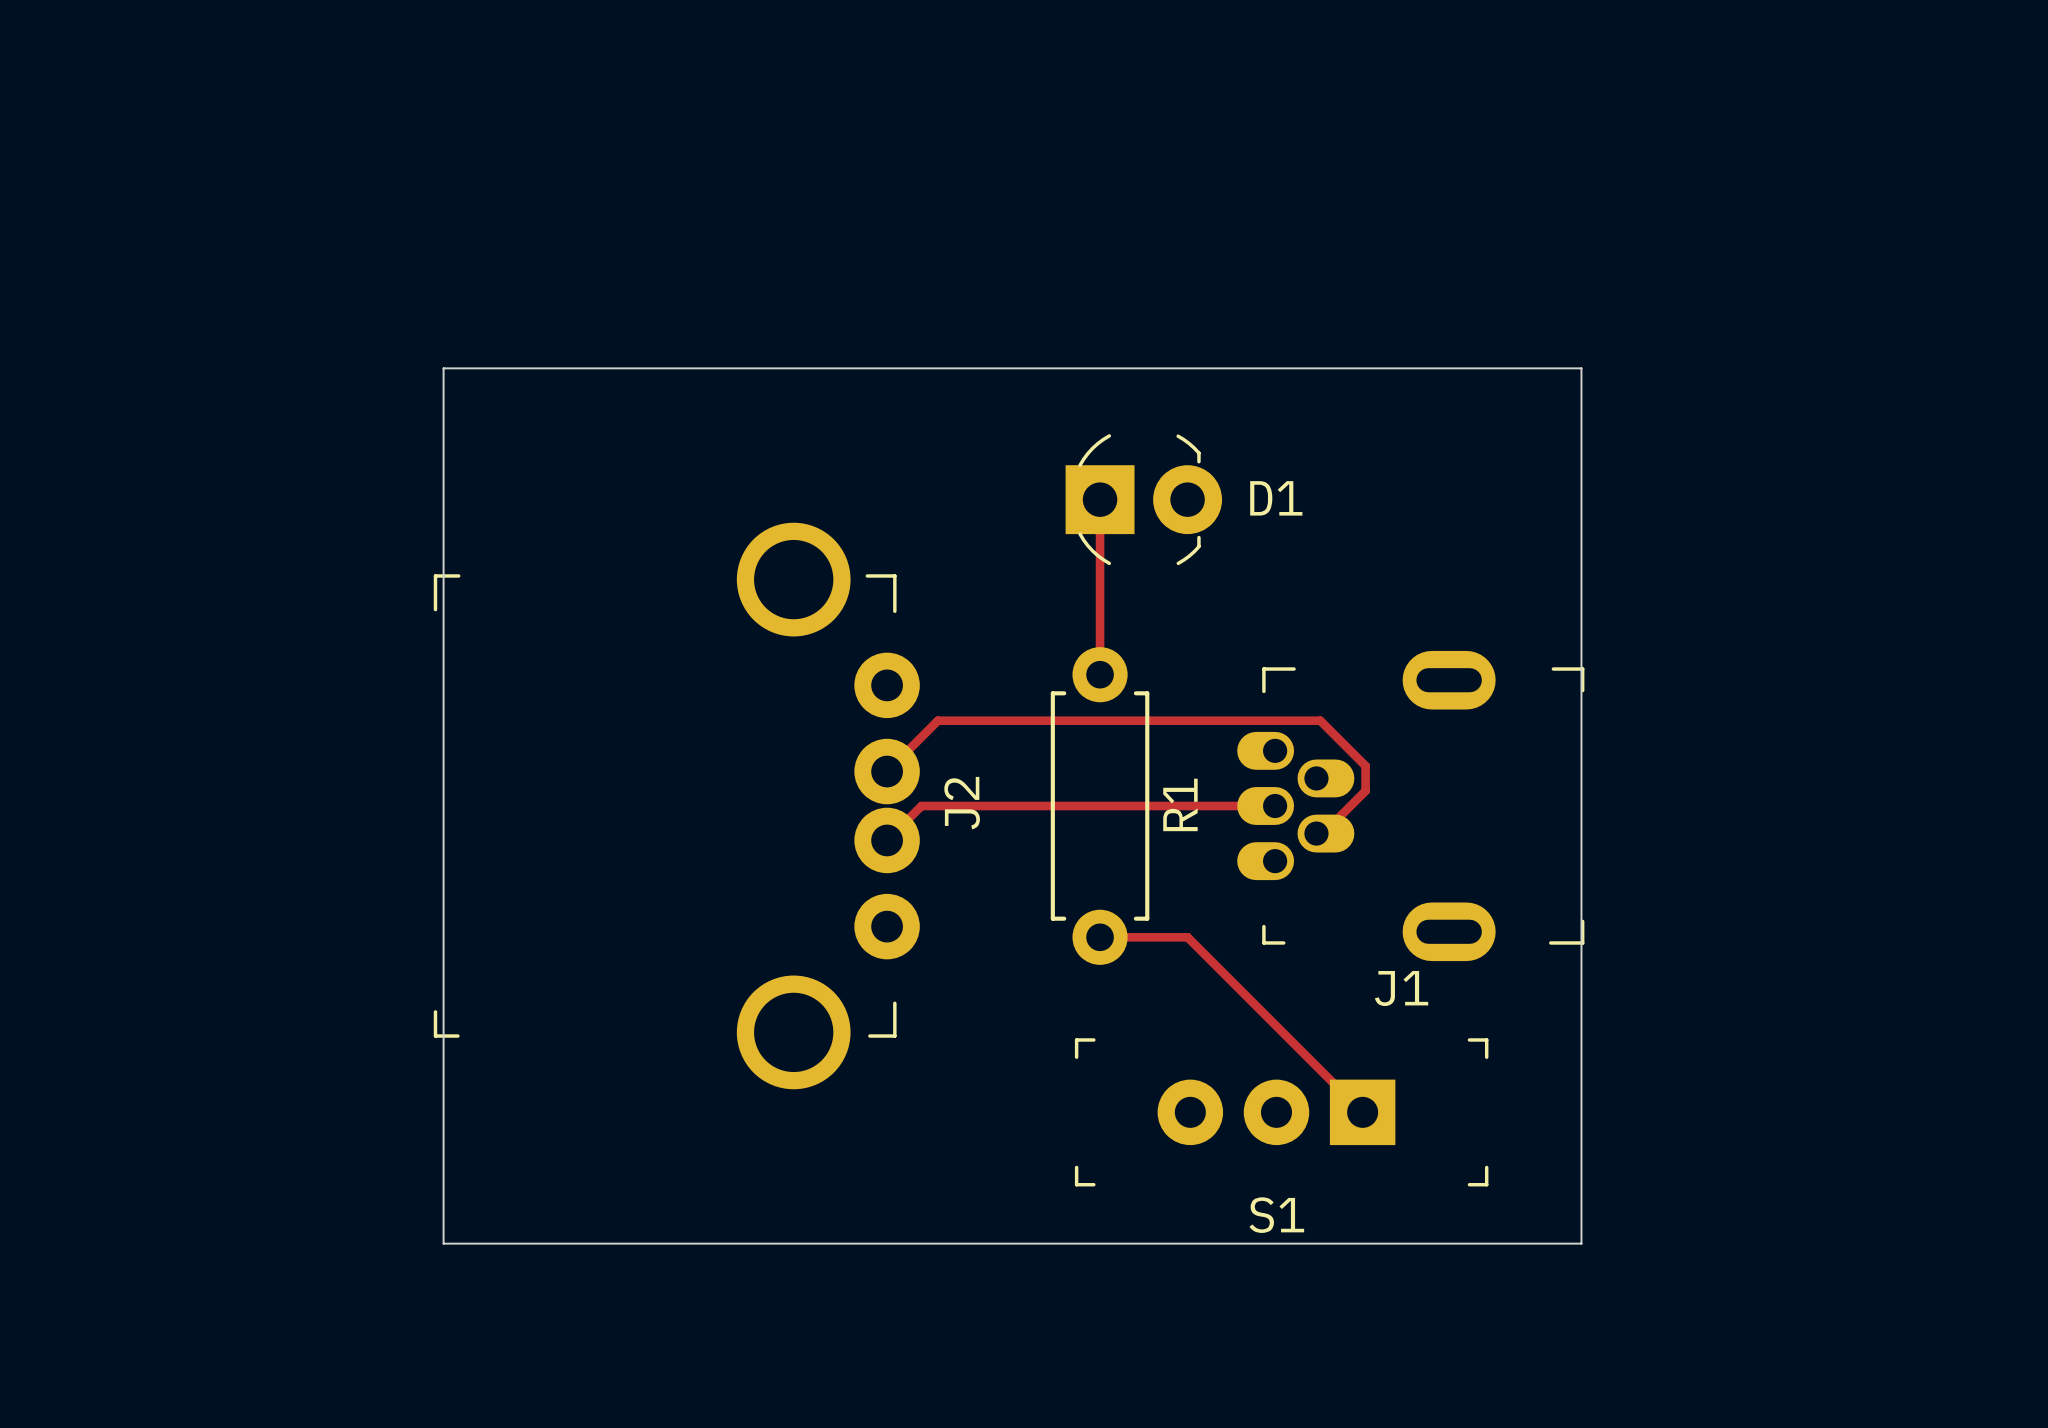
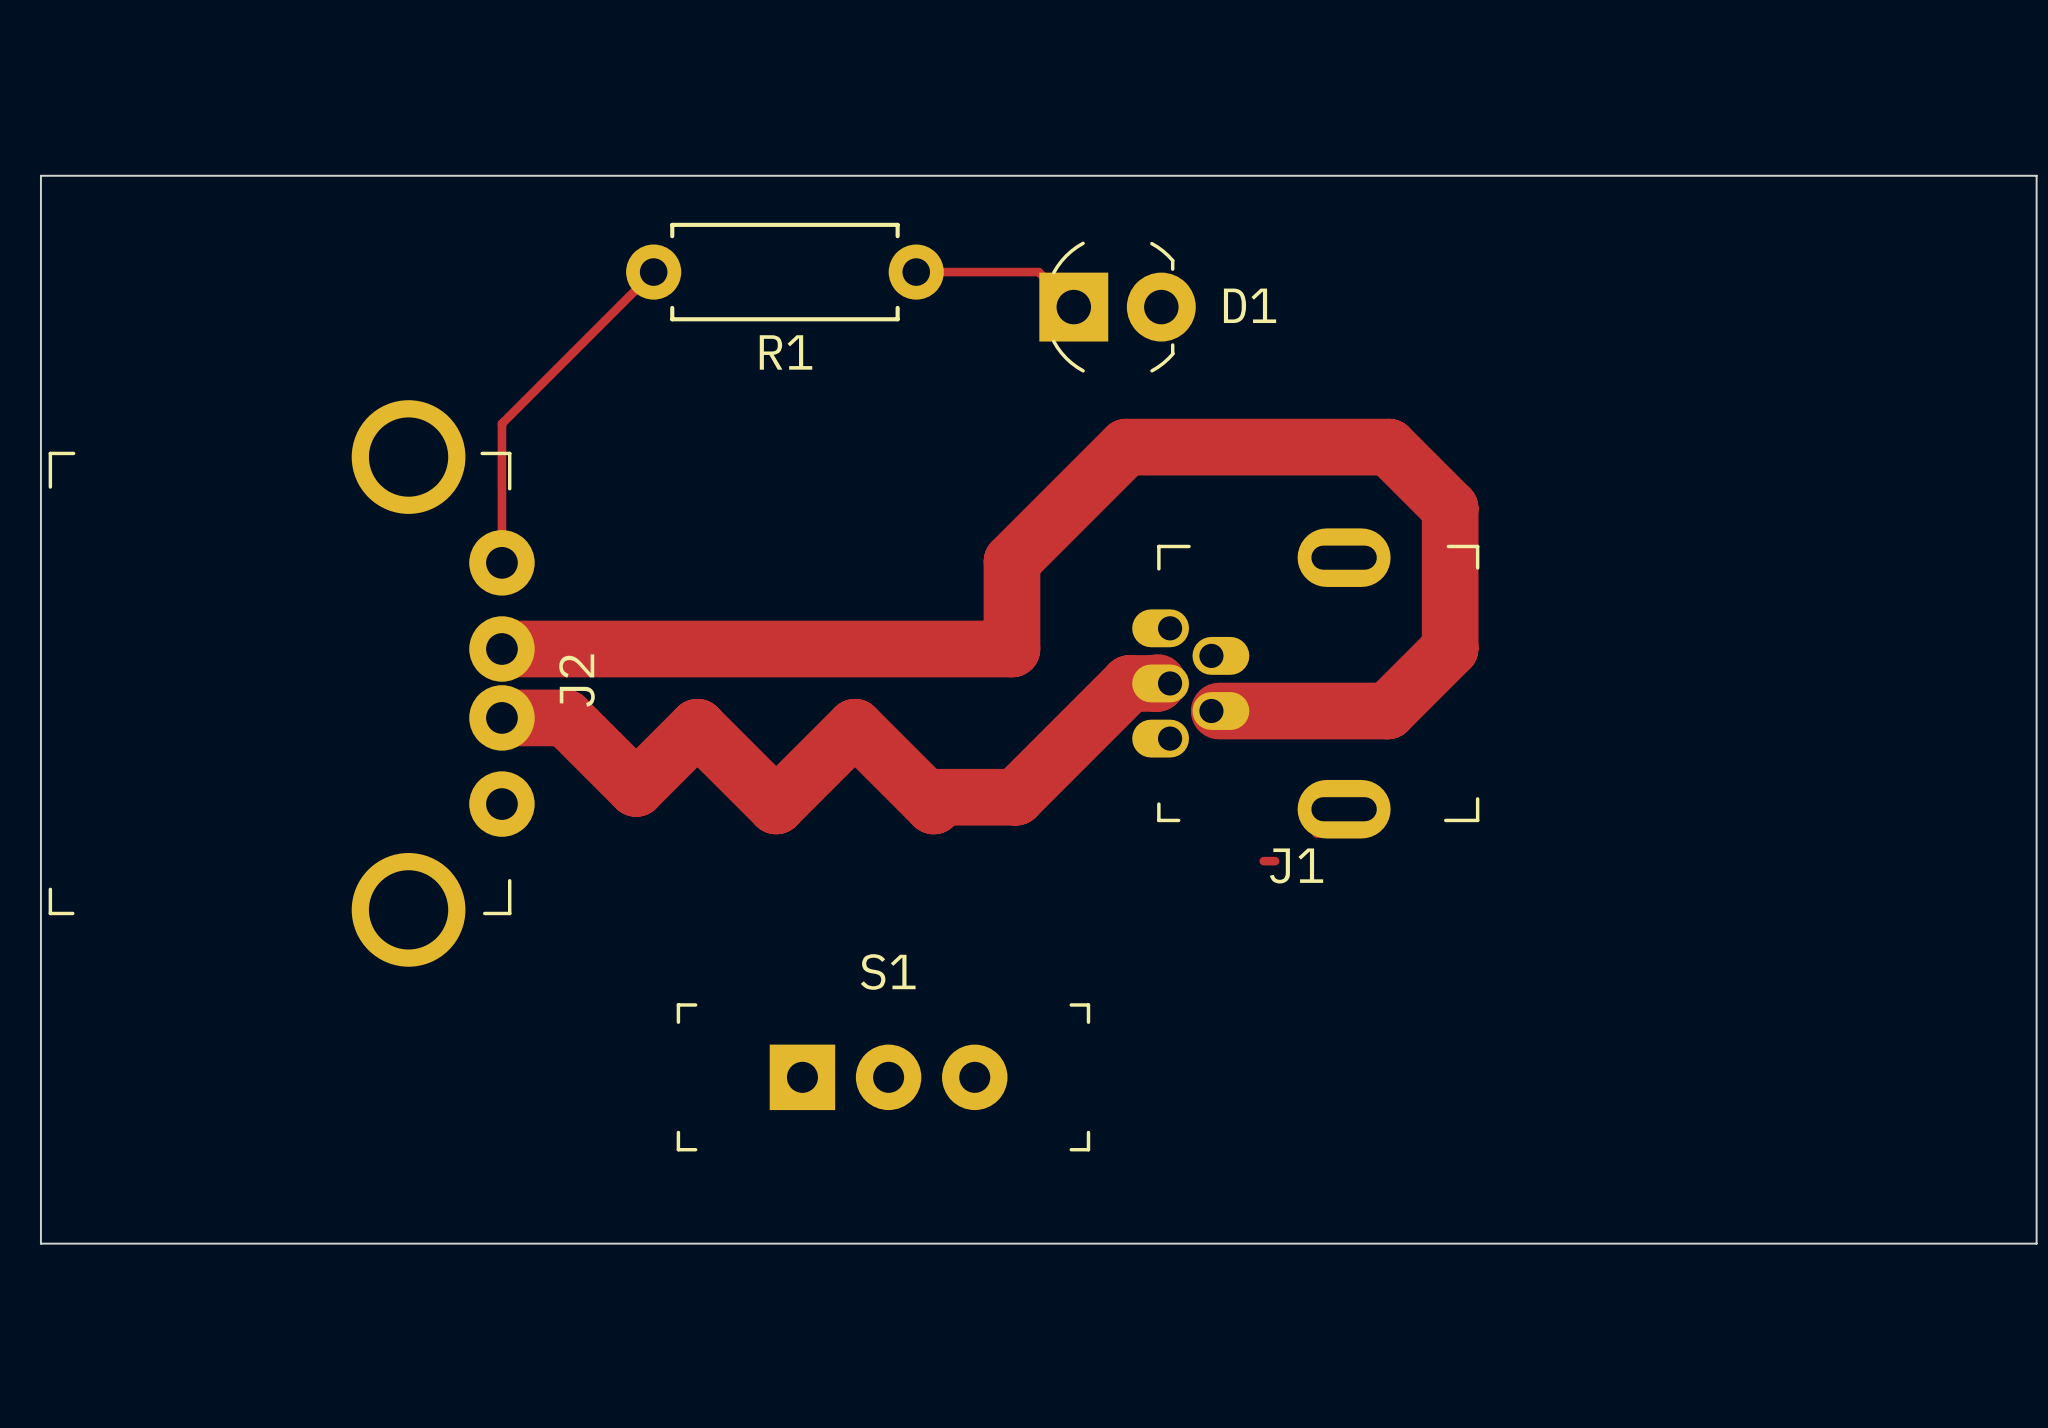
track: none -> (653, 272) (501, 423) (501, 562)
track: none -> (916, 272) (1038, 272) (1073, 307)
track: (1100, 499) (1100, 674) -> none
D1 position: (1143, 499) -> (1117, 307)
track: none -> (501, 649) (1011, 649) (1011, 561) (1126, 447) (1388, 447) (1450, 508) (1450, 648) (1387, 711) (1219, 711)
track: none -> (1157, 682) (1129, 683) (1015, 797) (933, 797) (933, 806) (854, 727) (776, 806) (697, 727) (636, 788) (565, 717) (501, 717)
track: (887, 771) (937, 720) (1320, 720) (1365, 765) (1365, 790) (1322, 833) -> none
J2 position: (676, 806) -> (291, 683)
R1 rotation: 0° (1100, 806) -> 90° clockwise (784, 272)
R1 position: (1100, 806) -> (784, 272)
track: (1275, 806) (921, 806) (887, 840) -> none
J1 position: (1410, 806) -> (1305, 683)
track: (1100, 937) (1187, 937) (1362, 1112) -> none
S1 rotation: 0° (1281, 1112) -> 180° (883, 1077)
S1 position: (1281, 1112) -> (883, 1077)
board edge: (443, 1243) (443, 368) (1581, 368) (1581, 1243) -> (443, 1243) (40, 1243) (40, 175) (2036, 175) (2036, 1243) (1581, 1243)

